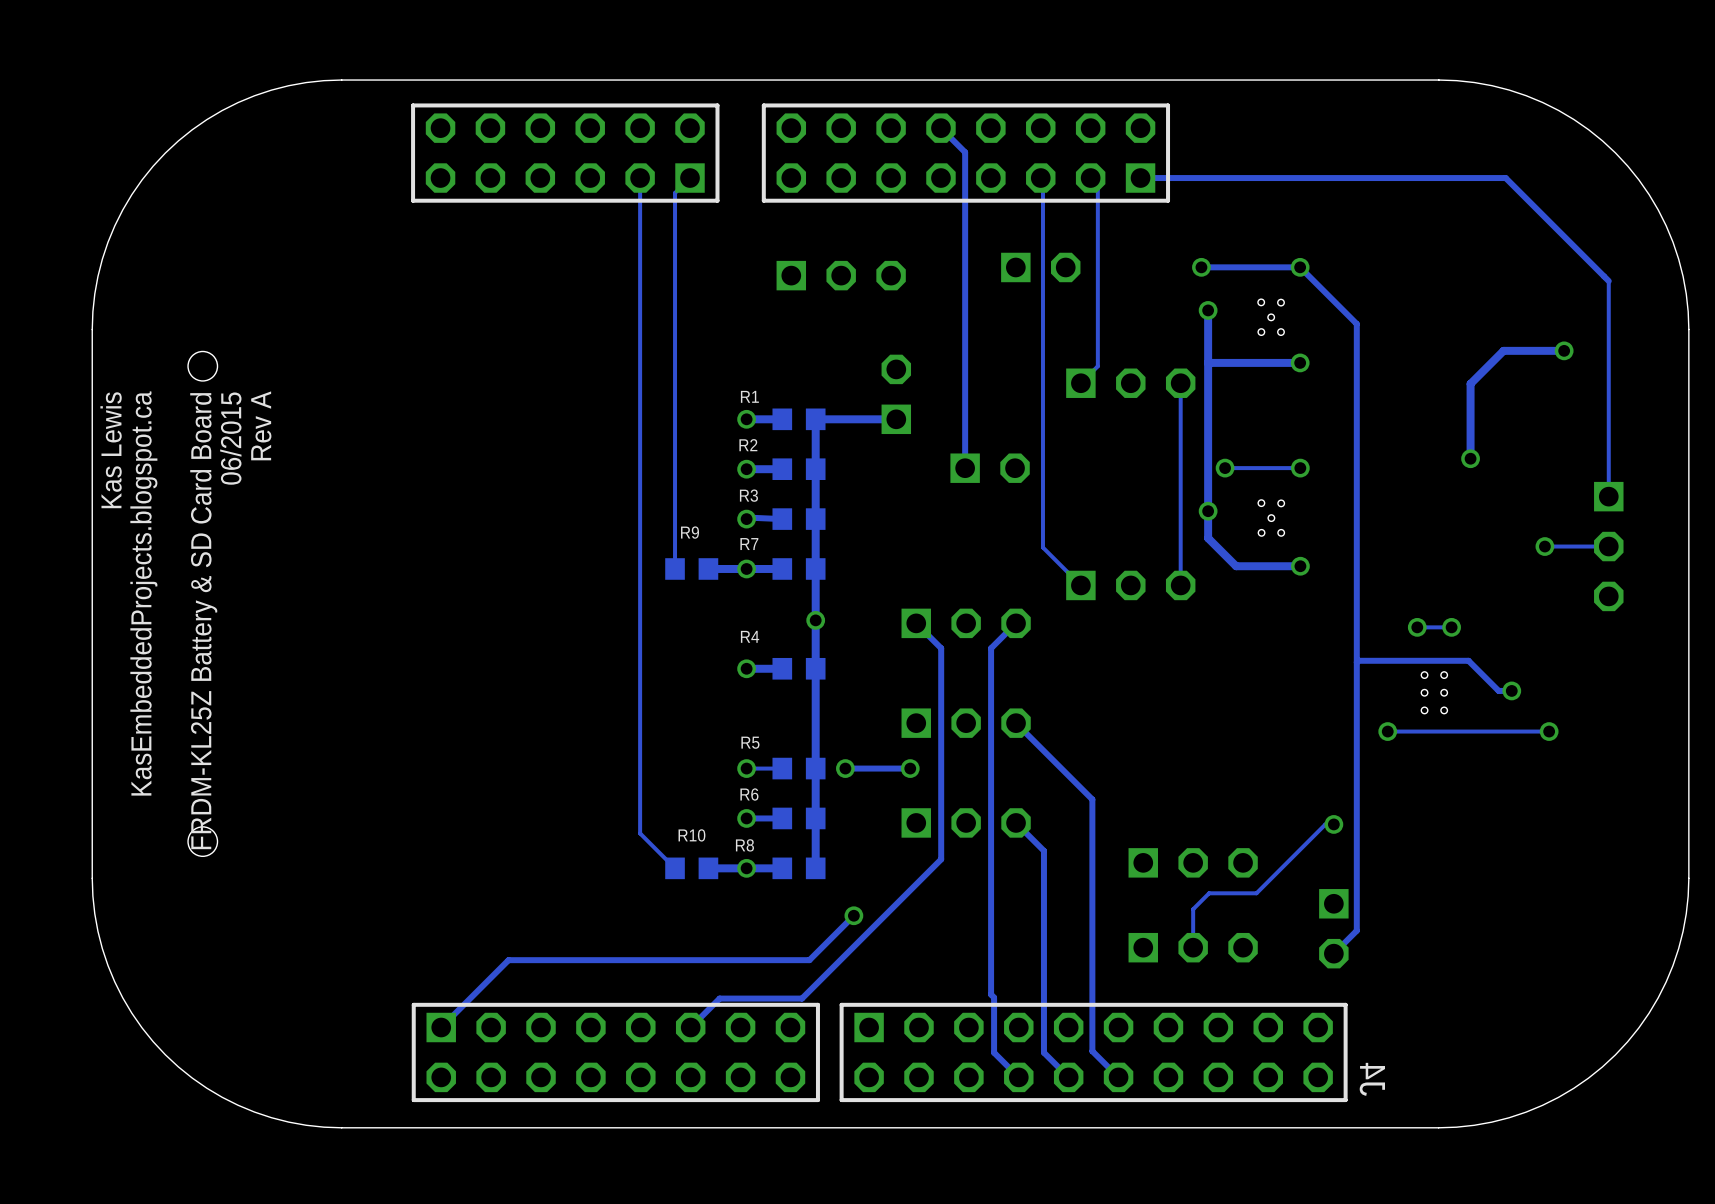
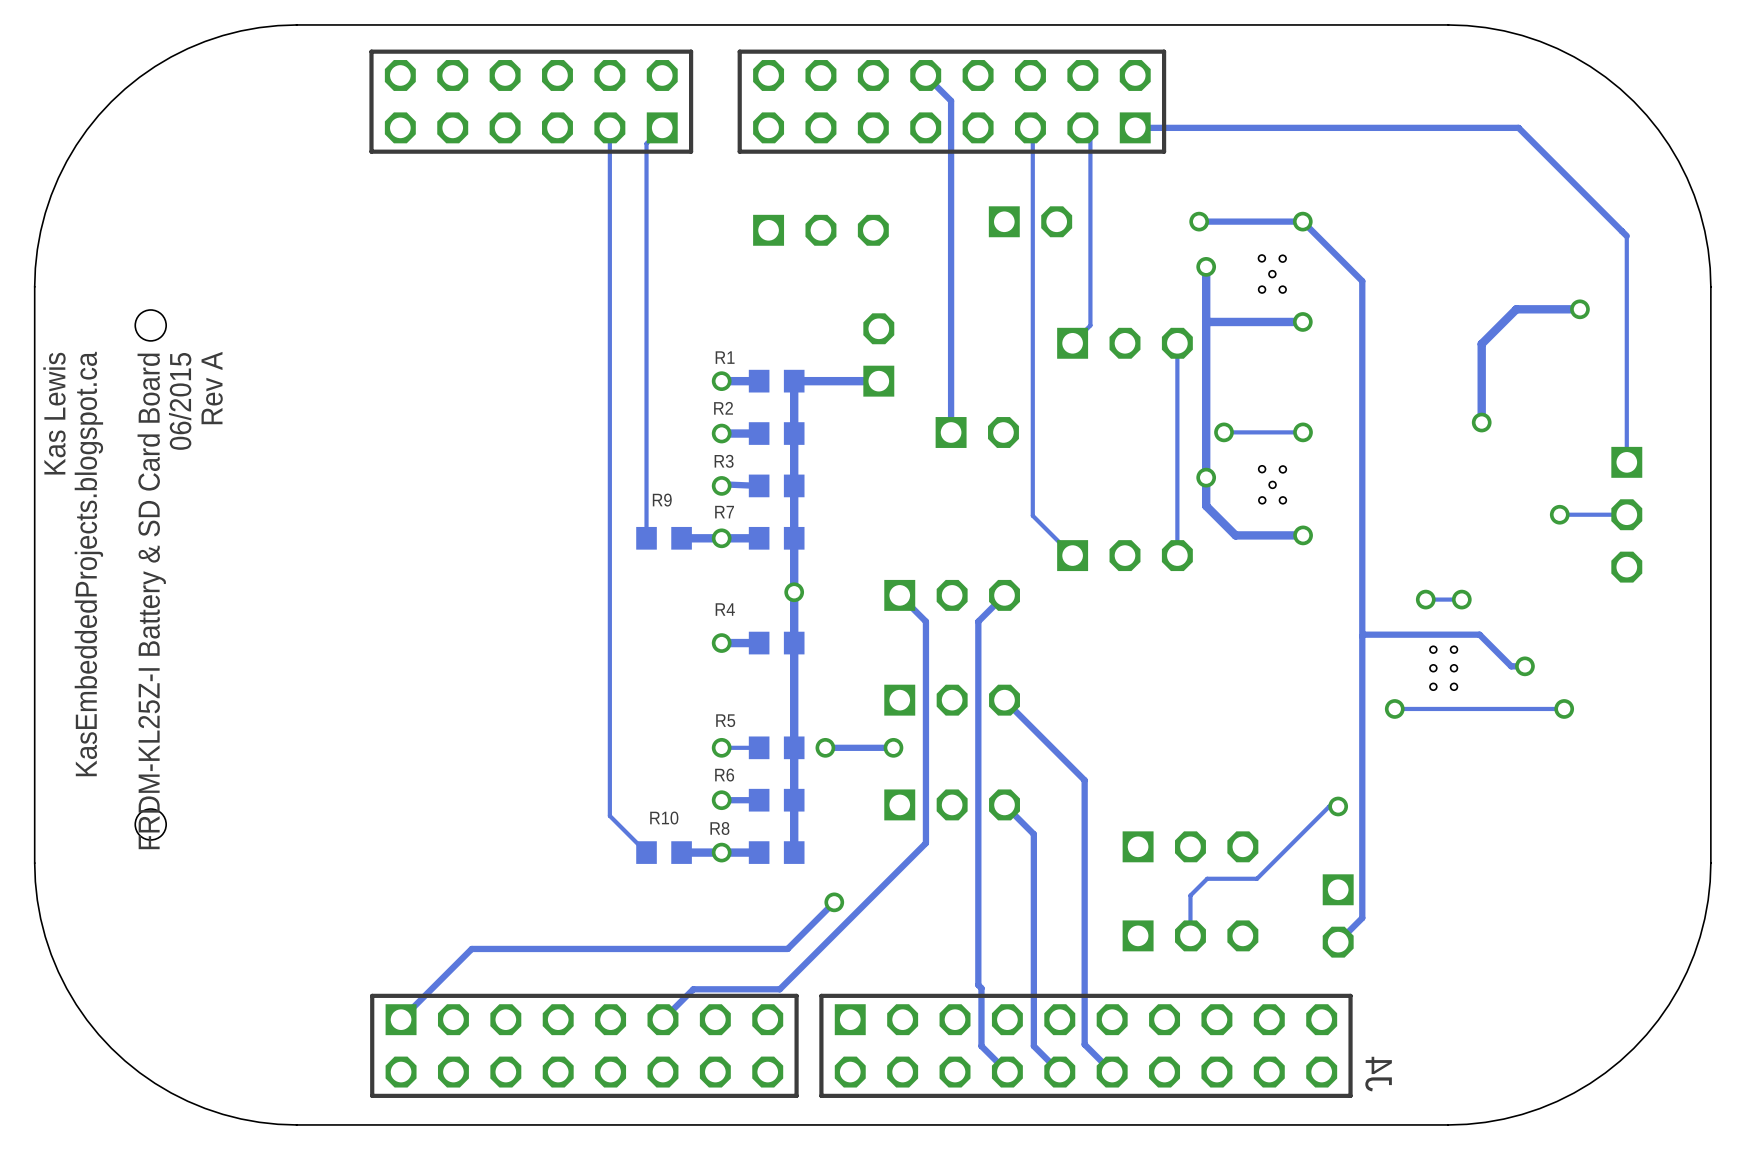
text: FRDM-KL25Z Battery & SD Card Board (203, 621) -> FRDM-KL25Z-I Battery & SD Card Board (151, 601)

